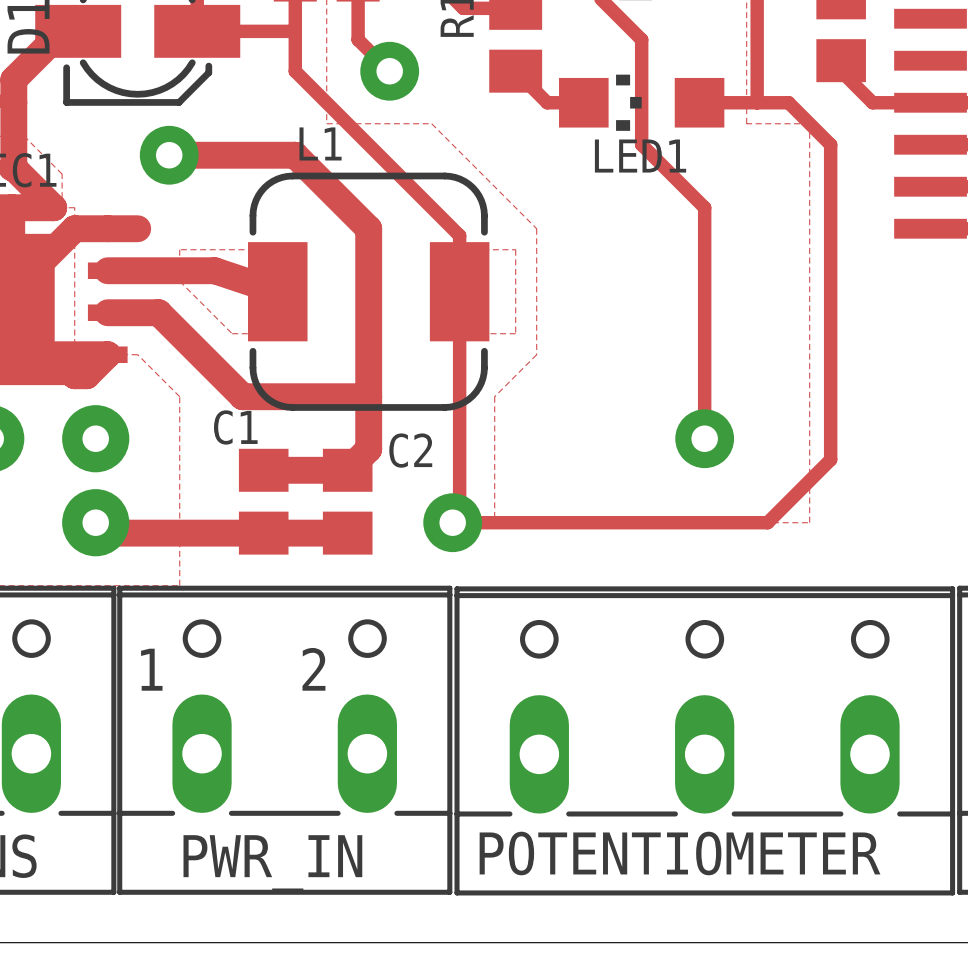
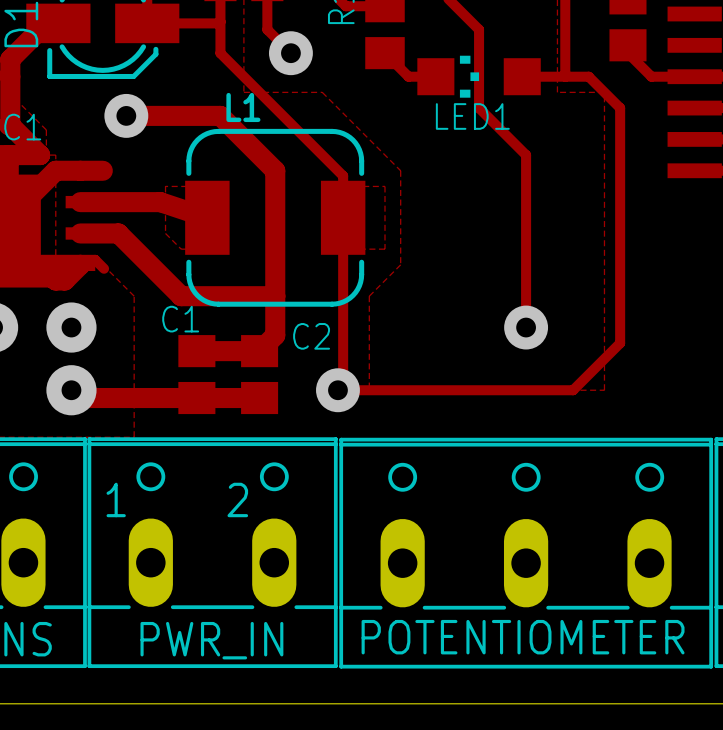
zone outline: (221, 249) (179, 249) (179, 281) (232, 333) (242, 333) -> (165, 186) (165, 233) (181, 249)
track: none -> (79, 259) (95, 259) (104, 268)

